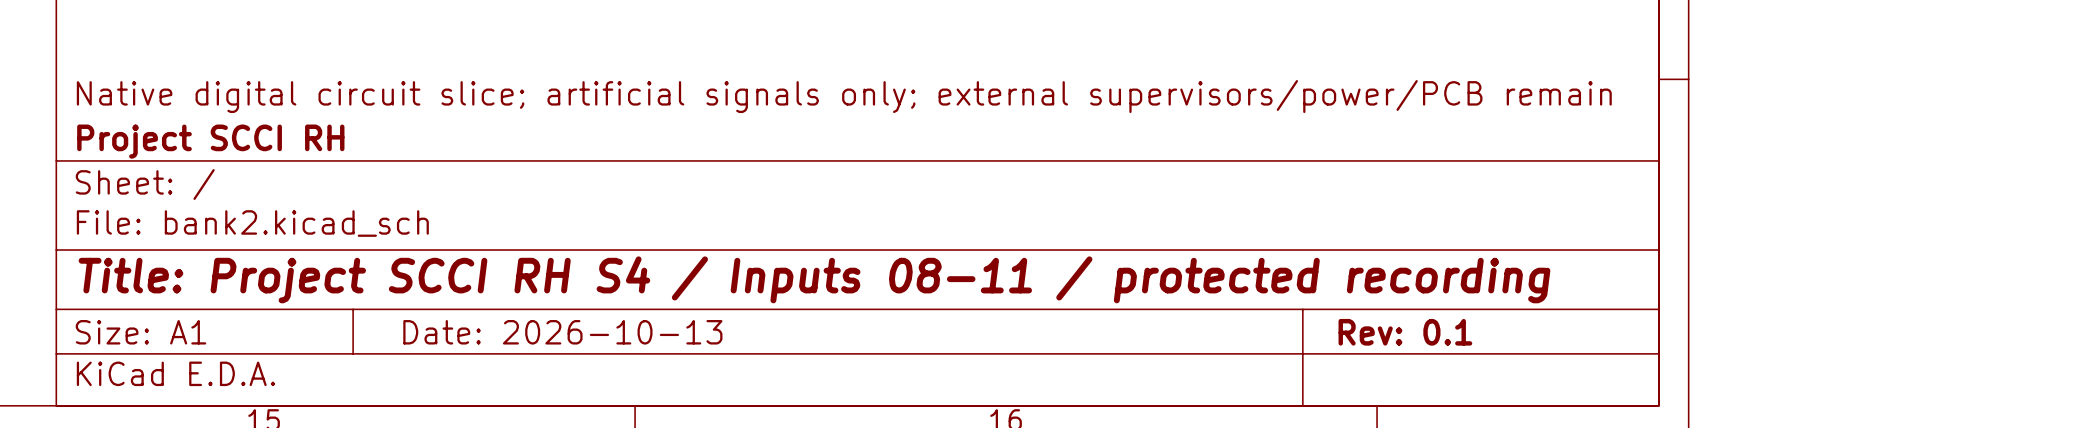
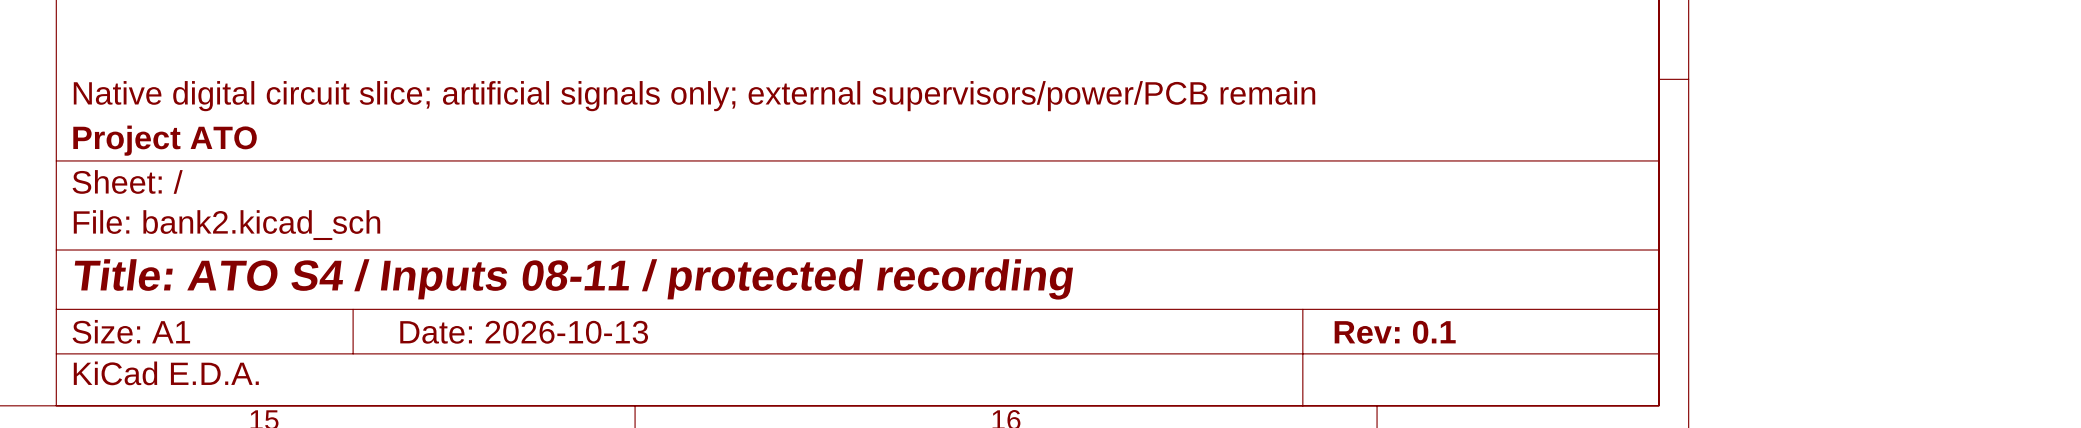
title block: Project SCCI RH (210, 141) -> Project ATO (165, 140)
title block: Title: Project SCCI RH S4 / Inputs 08-11 / protected recording (814, 279) -> Title: ATO S4 / Inputs 08-11 / protected recording (573, 279)

